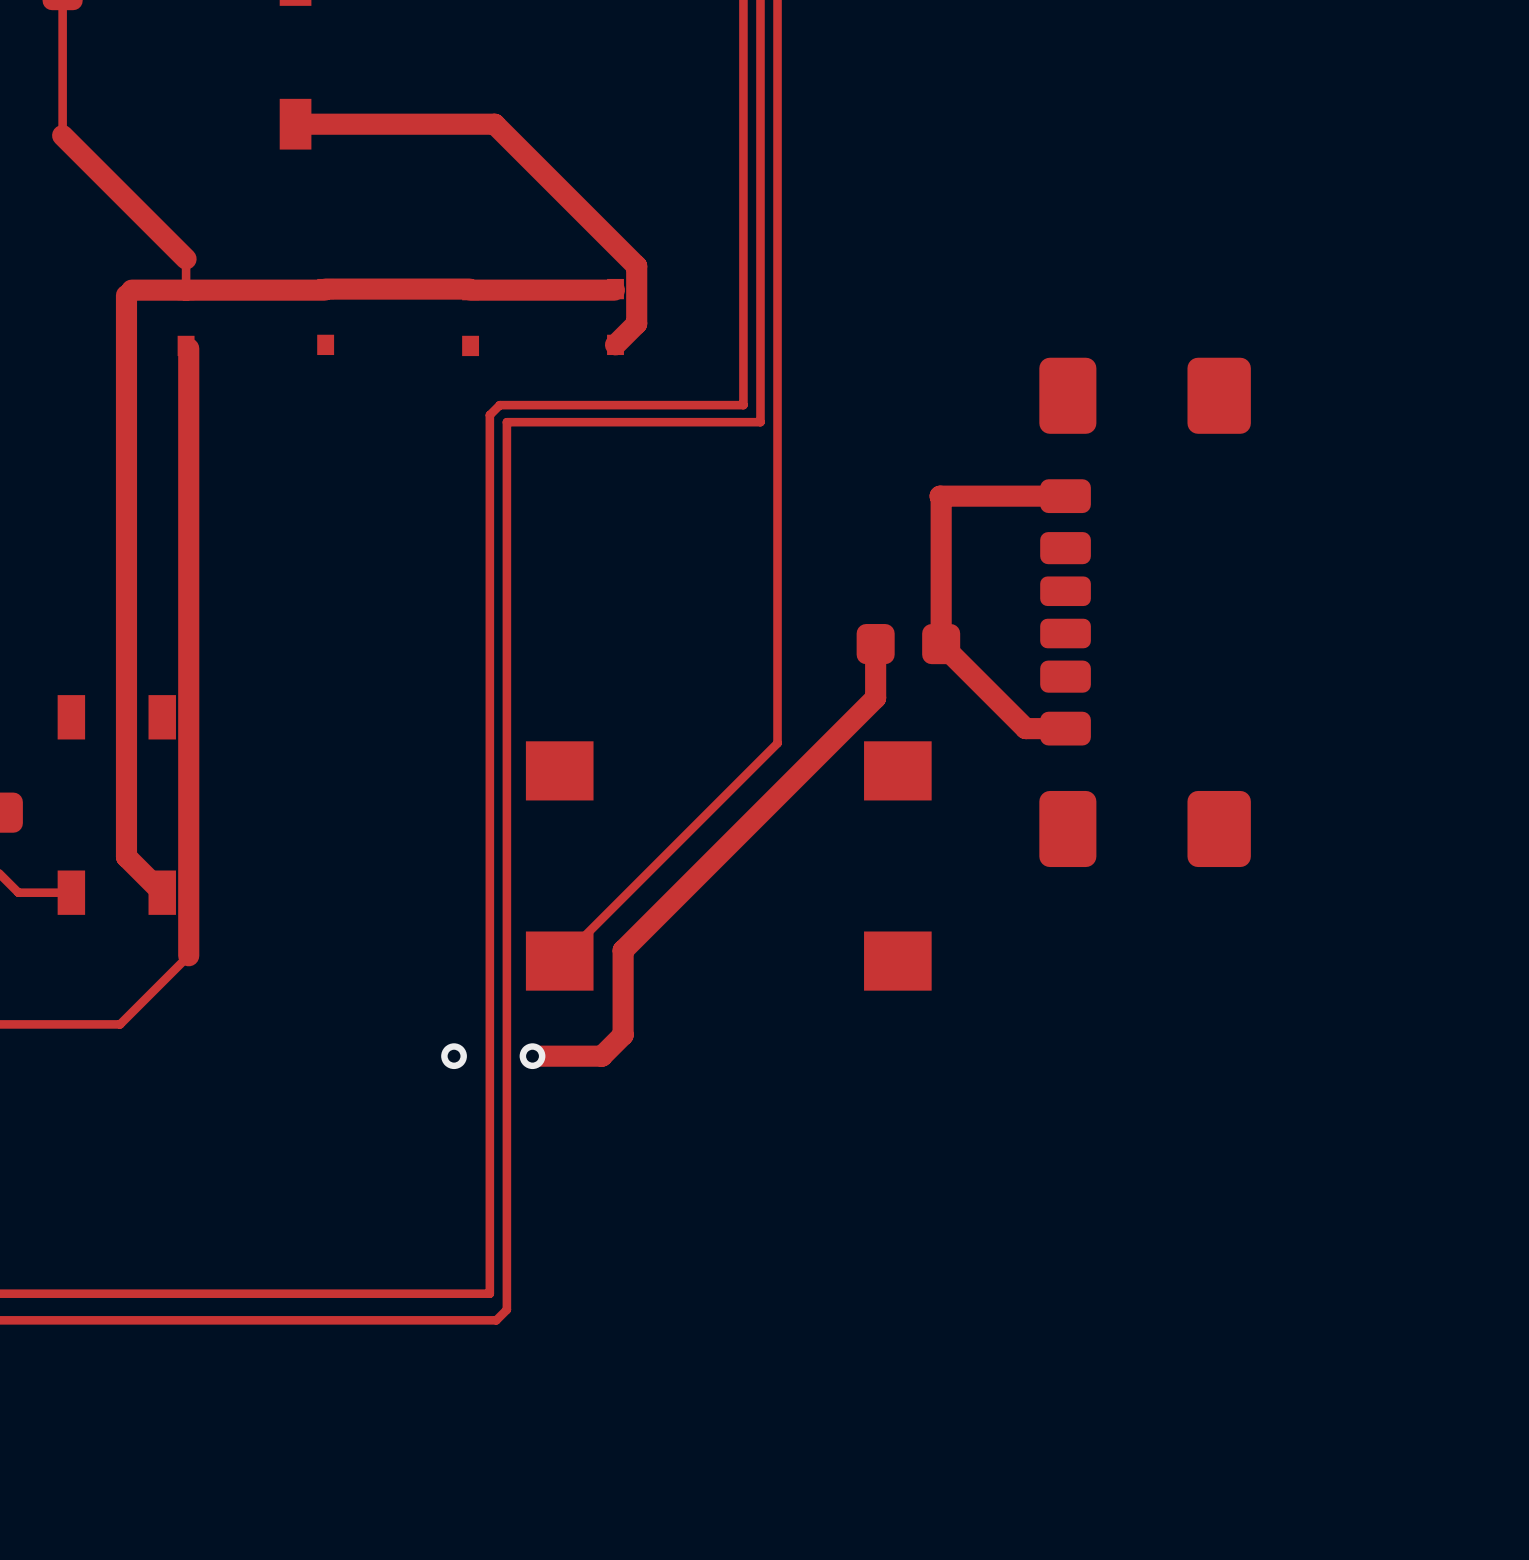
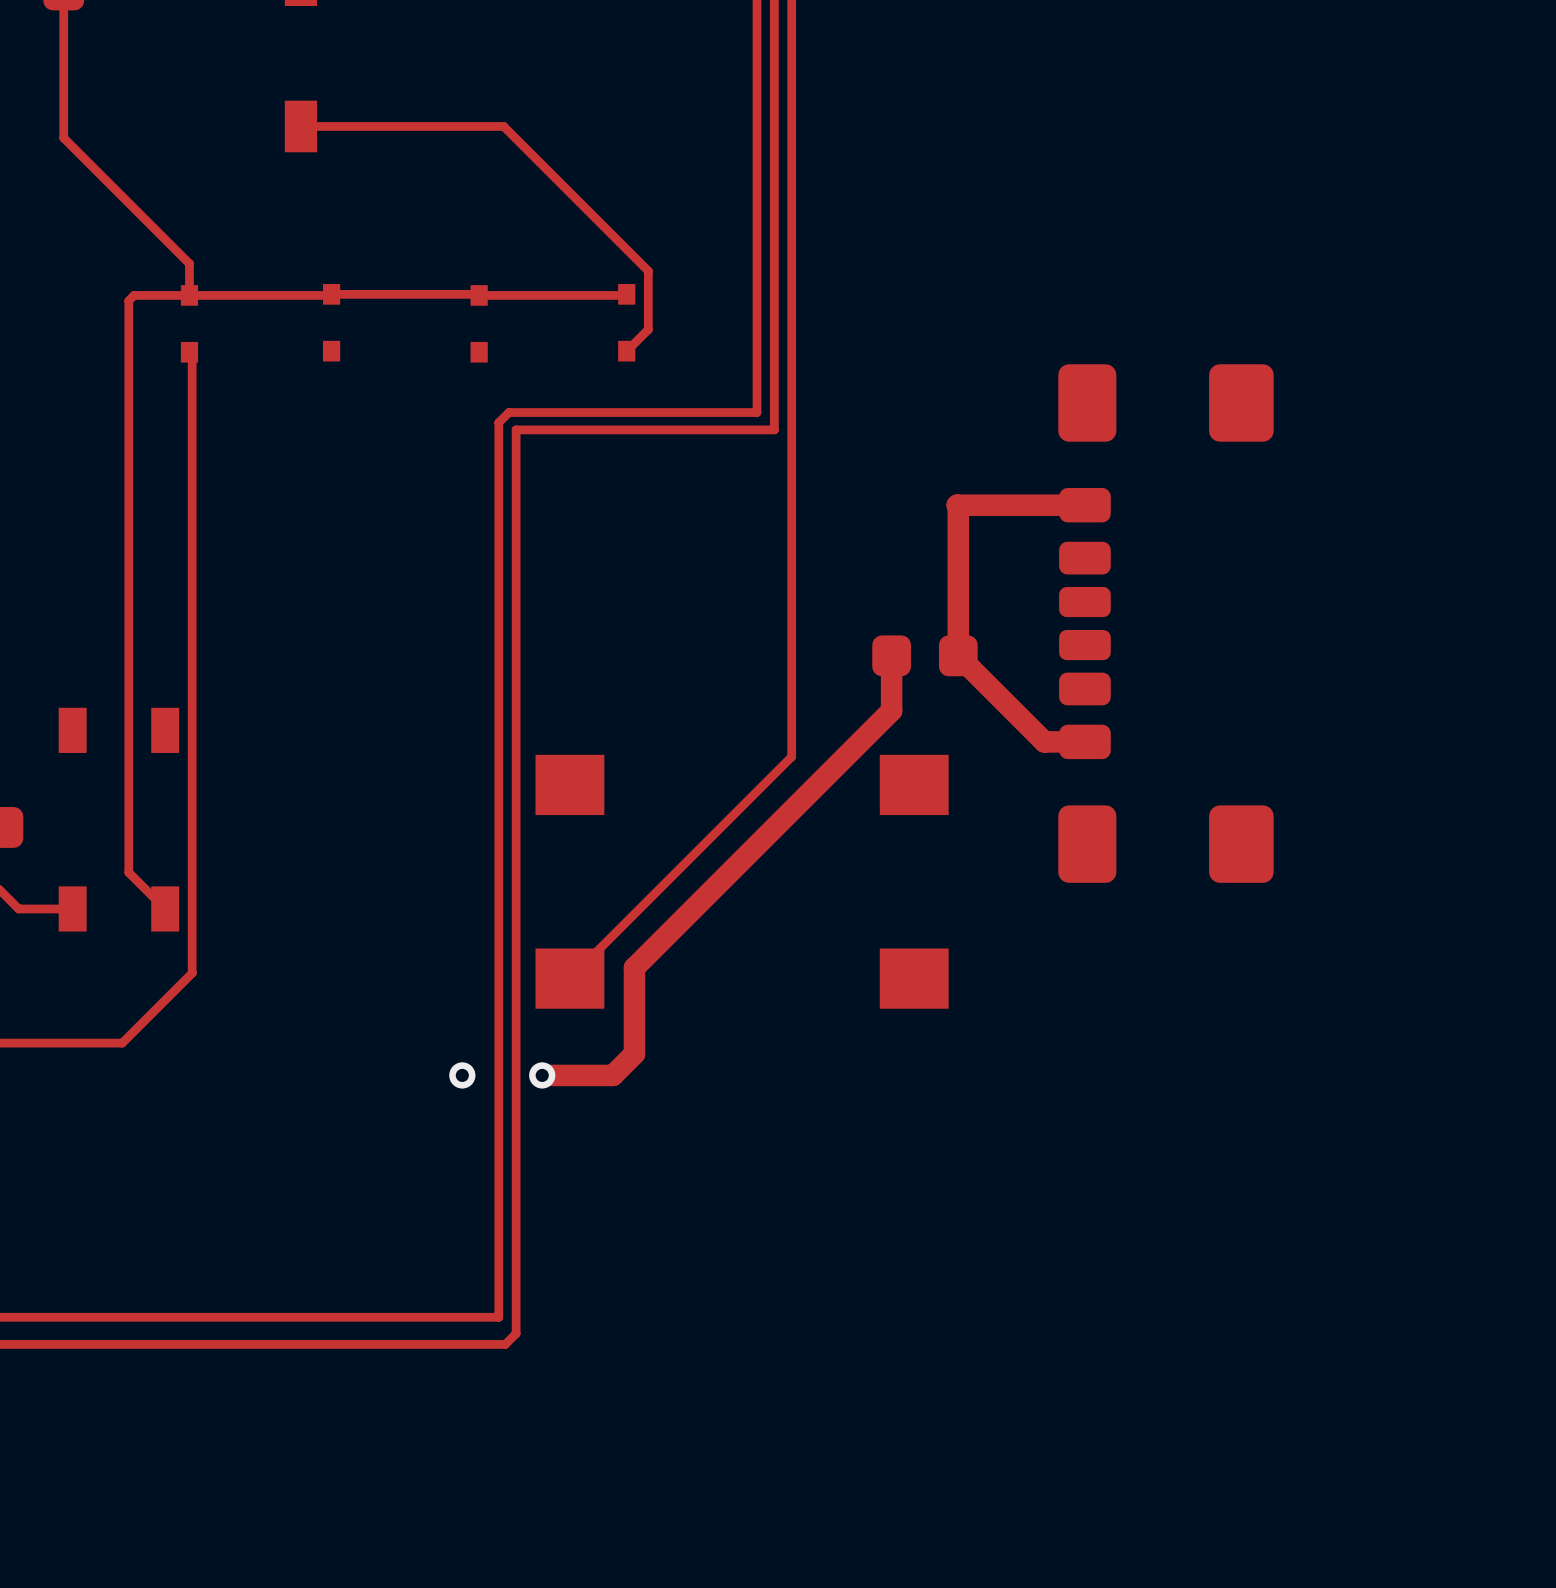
top track width: thick (295, 124) (494, 124) (636, 266) (636, 323) (615, 344) -> thin (300, 126) (503, 126) (648, 271) (648, 329) (626, 351)
top track width: thick (62, 135) (186, 258) -> thin (63, 138) (189, 263)
top track width: thick (469, 289) (325, 289) -> thin (478, 294) (331, 294)
top track width: thick (324, 290) (131, 290) -> thin (330, 295) (134, 295)
top track width: thick (614, 290) (470, 290) -> thin (625, 295) (479, 295)
top track width: thick (126, 295) (126, 856) (162, 892) -> thin (128, 300) (128, 872) (165, 908)
top track width: thick (188, 348) (188, 955) -> thin (192, 354) (192, 973)

